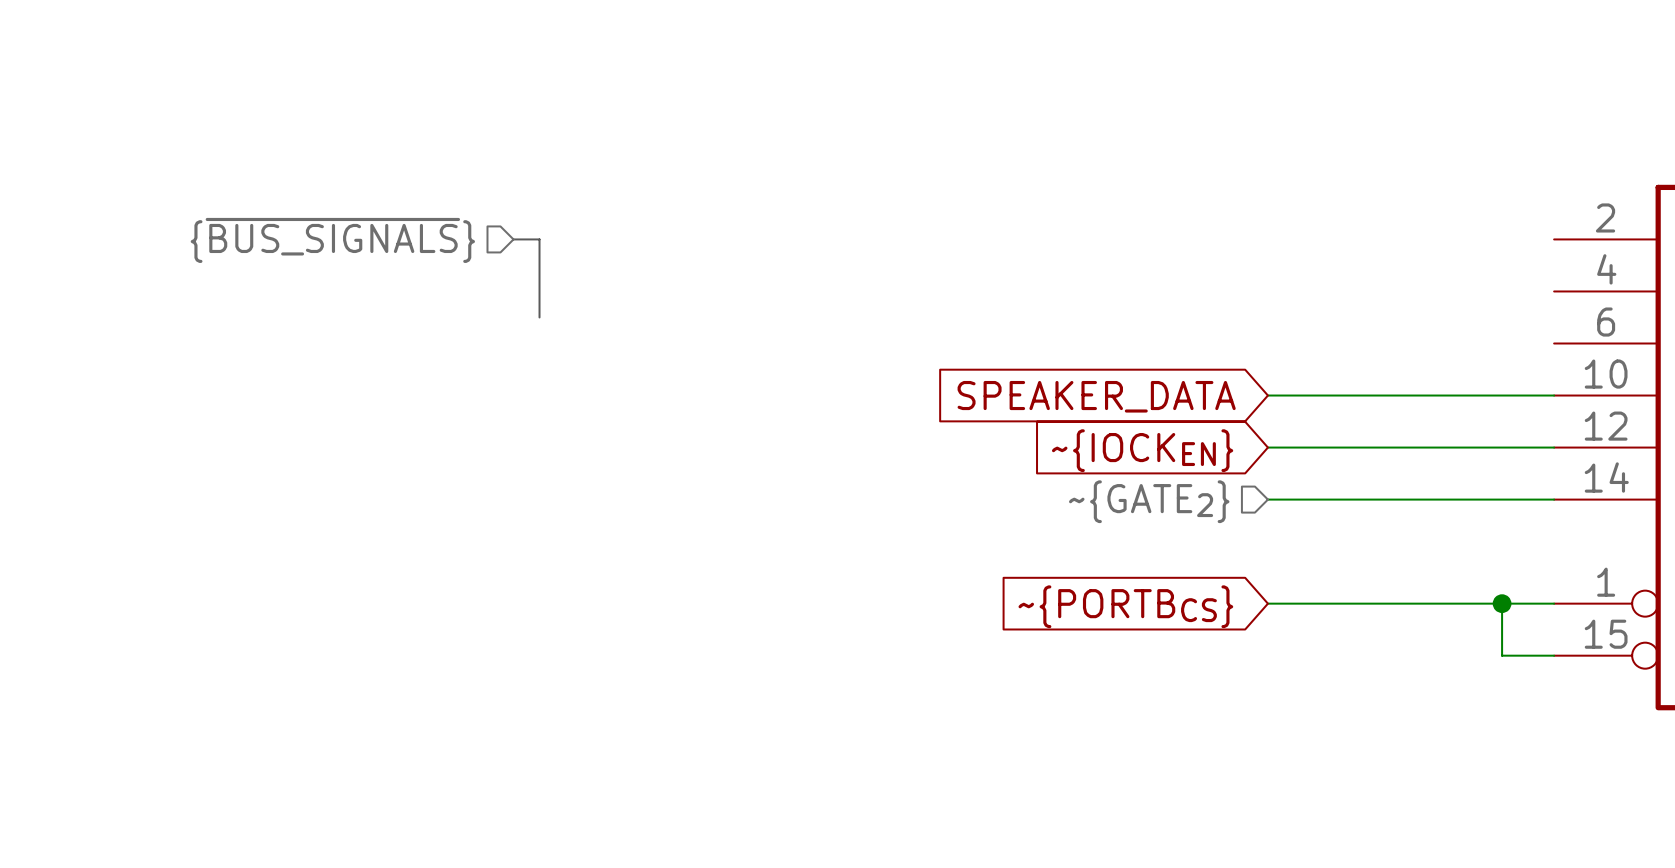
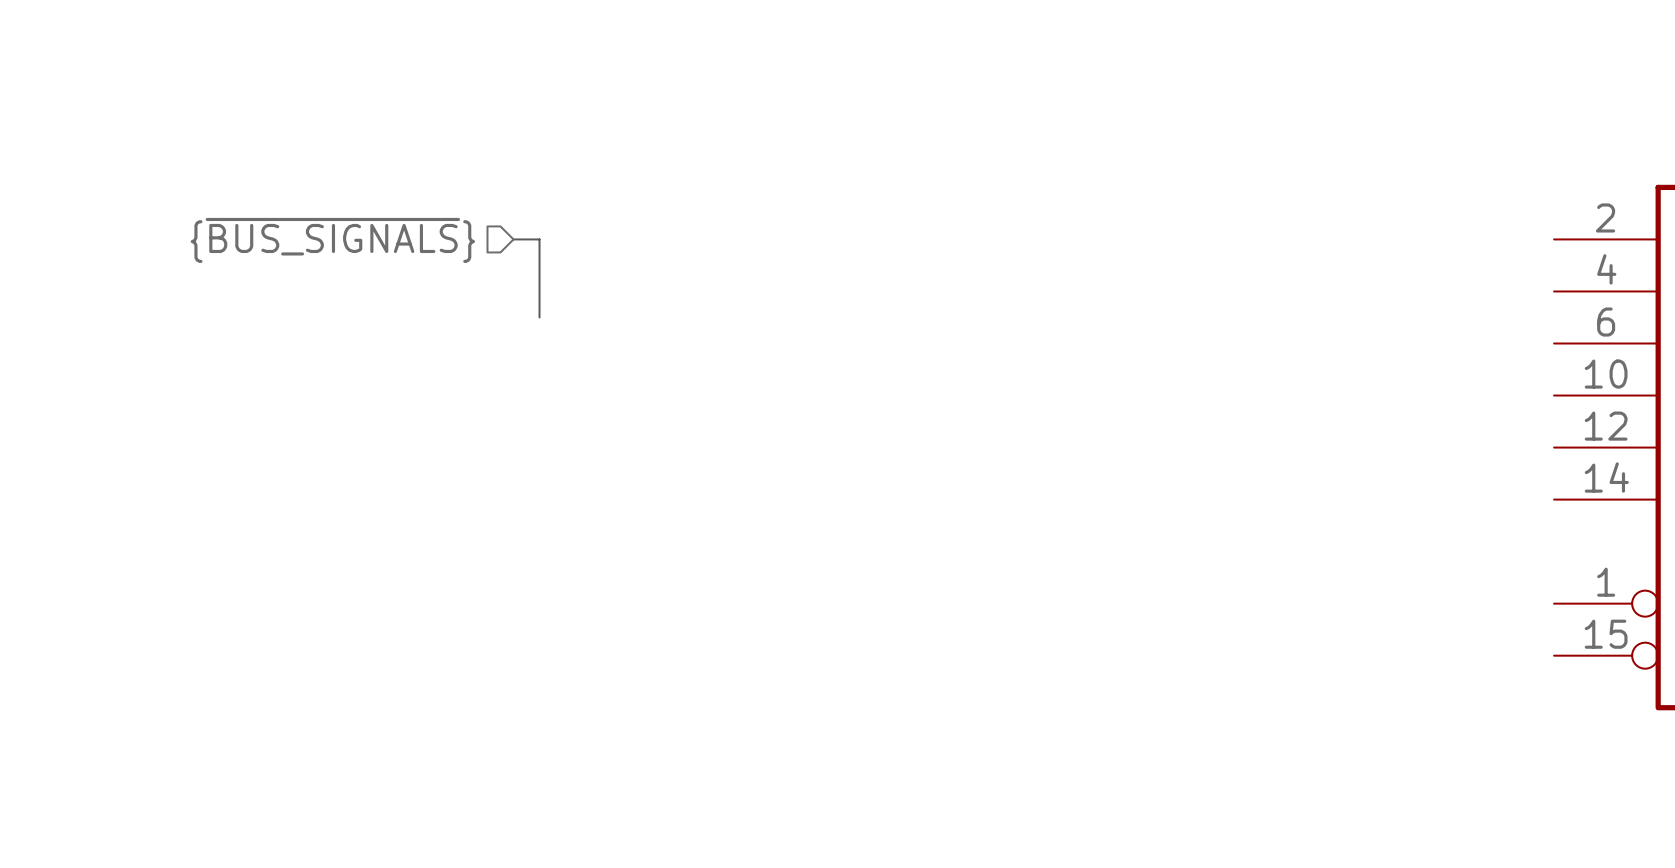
wire: (1267, 395) (1554, 395) -> none
global label: SPEAKER_DATA (1096, 396) -> none
wire: (1267, 447) (1554, 447) -> none
global label: ~{IOCKEN} (1142, 450) -> none
wire: (1267, 499) (1554, 499) -> none
hierarchical label: ~{GATE2} (1149, 501) -> none
wire: (1267, 603) (1554, 603) -> none
wire: (1502, 603) (1502, 655) (1554, 655) -> none
junction: (1502, 603) -> none
global label: ~{PORTBCS} (1125, 606) -> none

